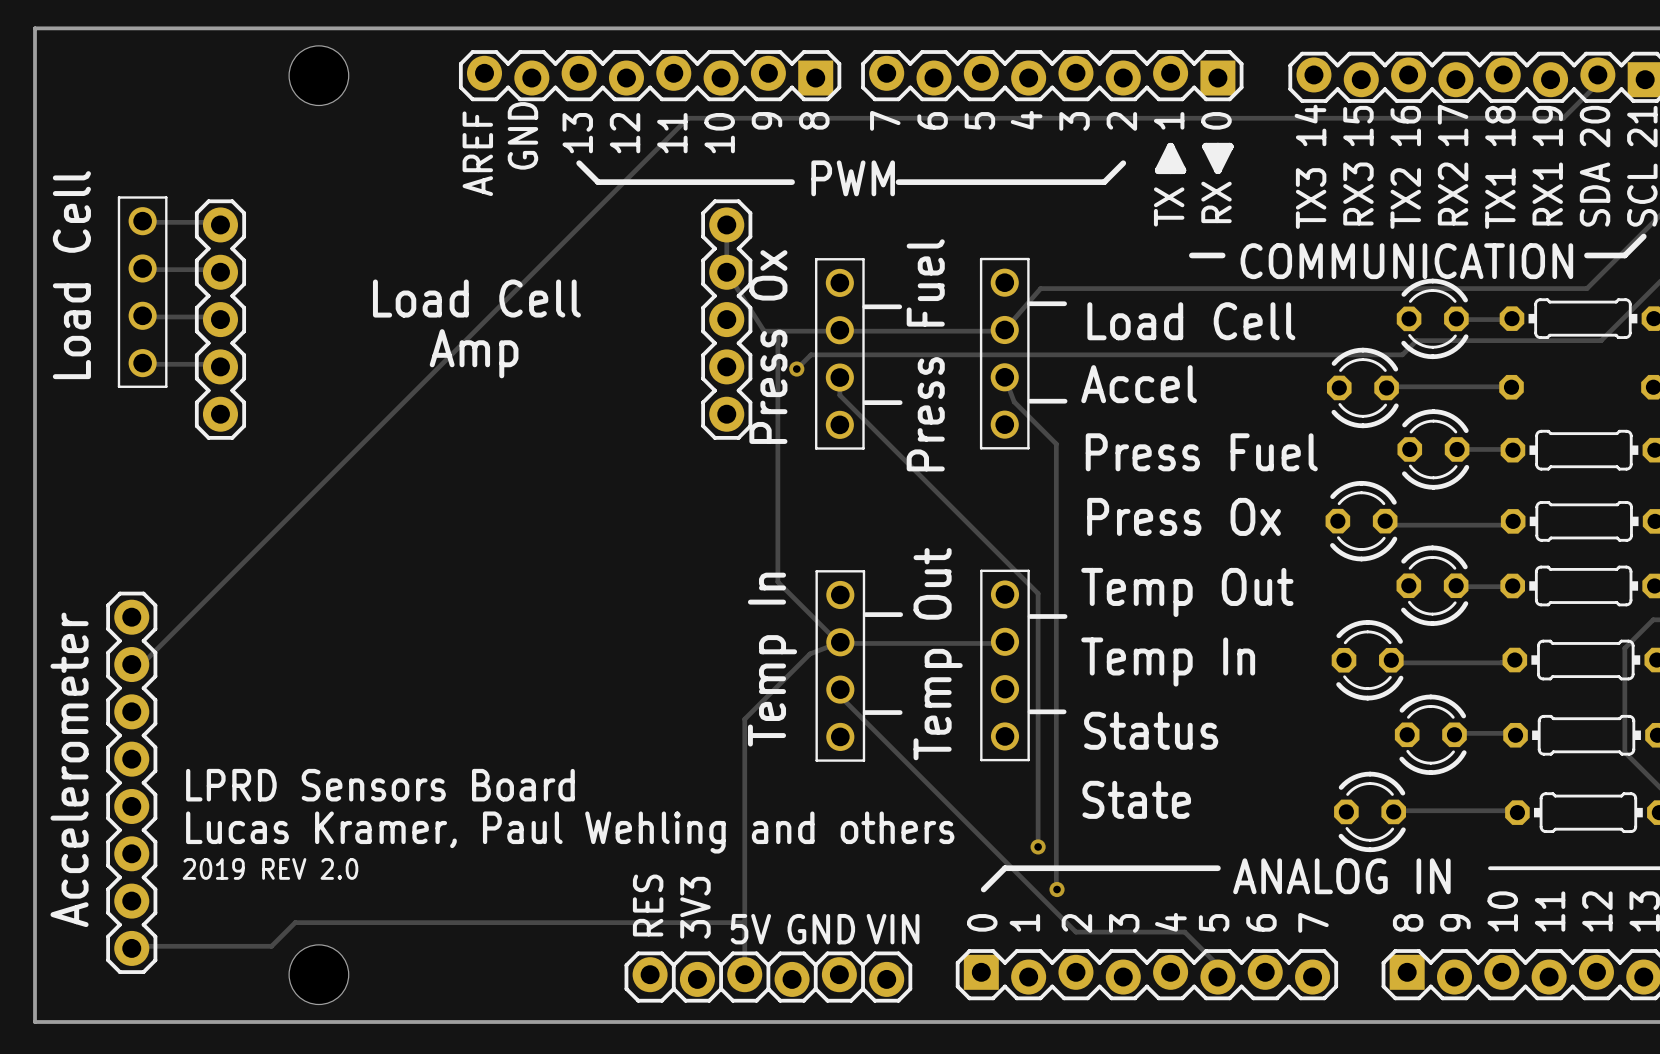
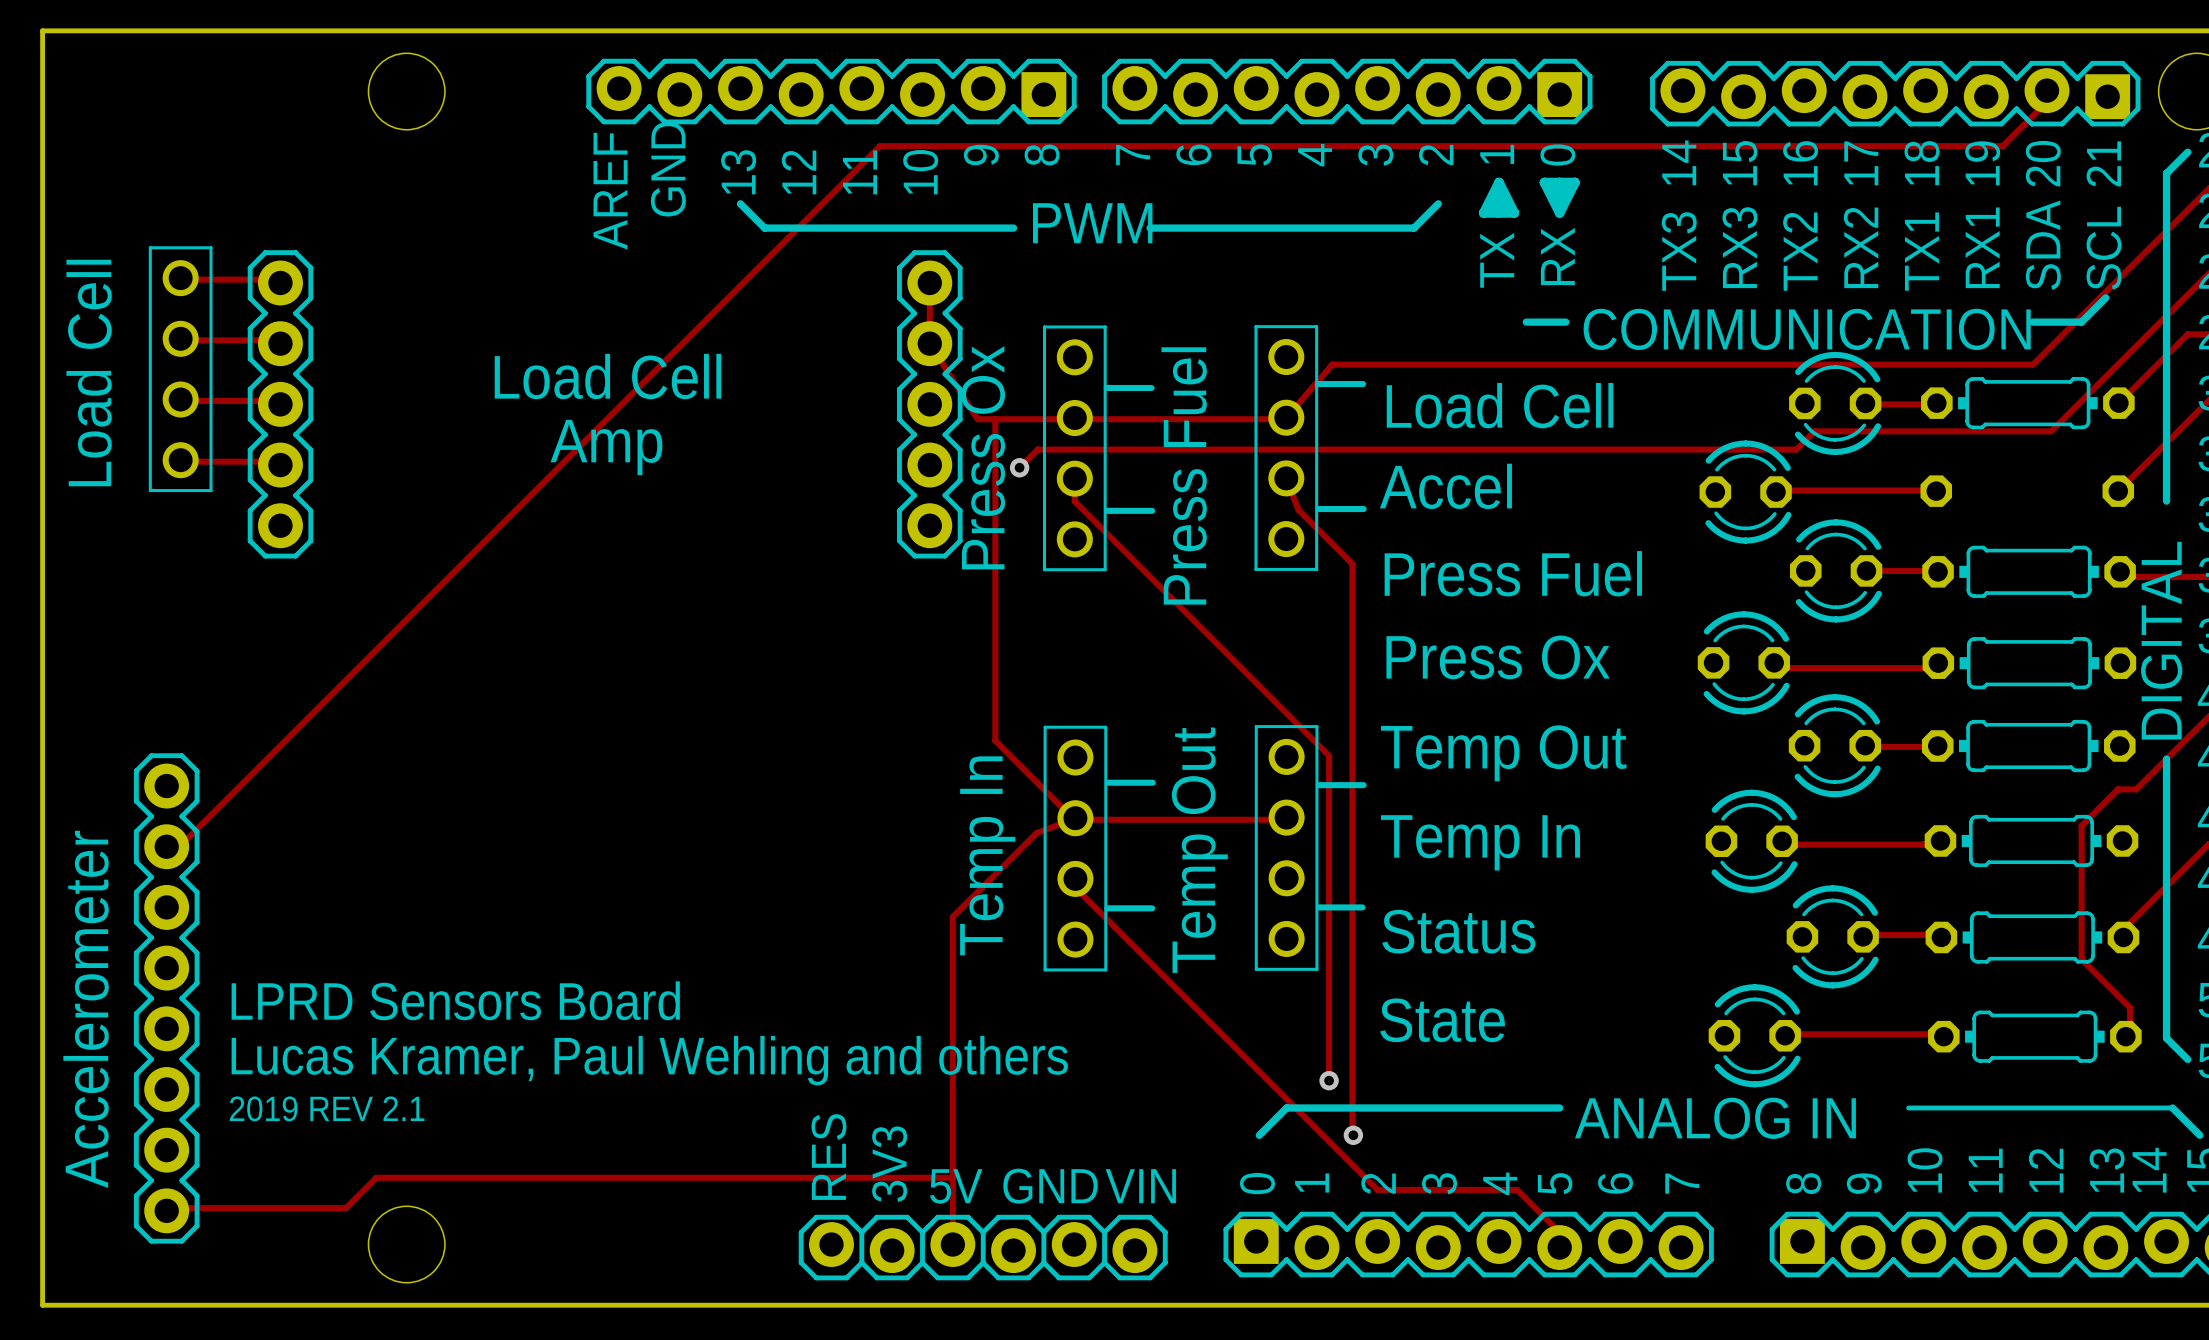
text: 2019 REV 2.0 (270, 868) -> 2019 REV 2.1 (327, 1108)

